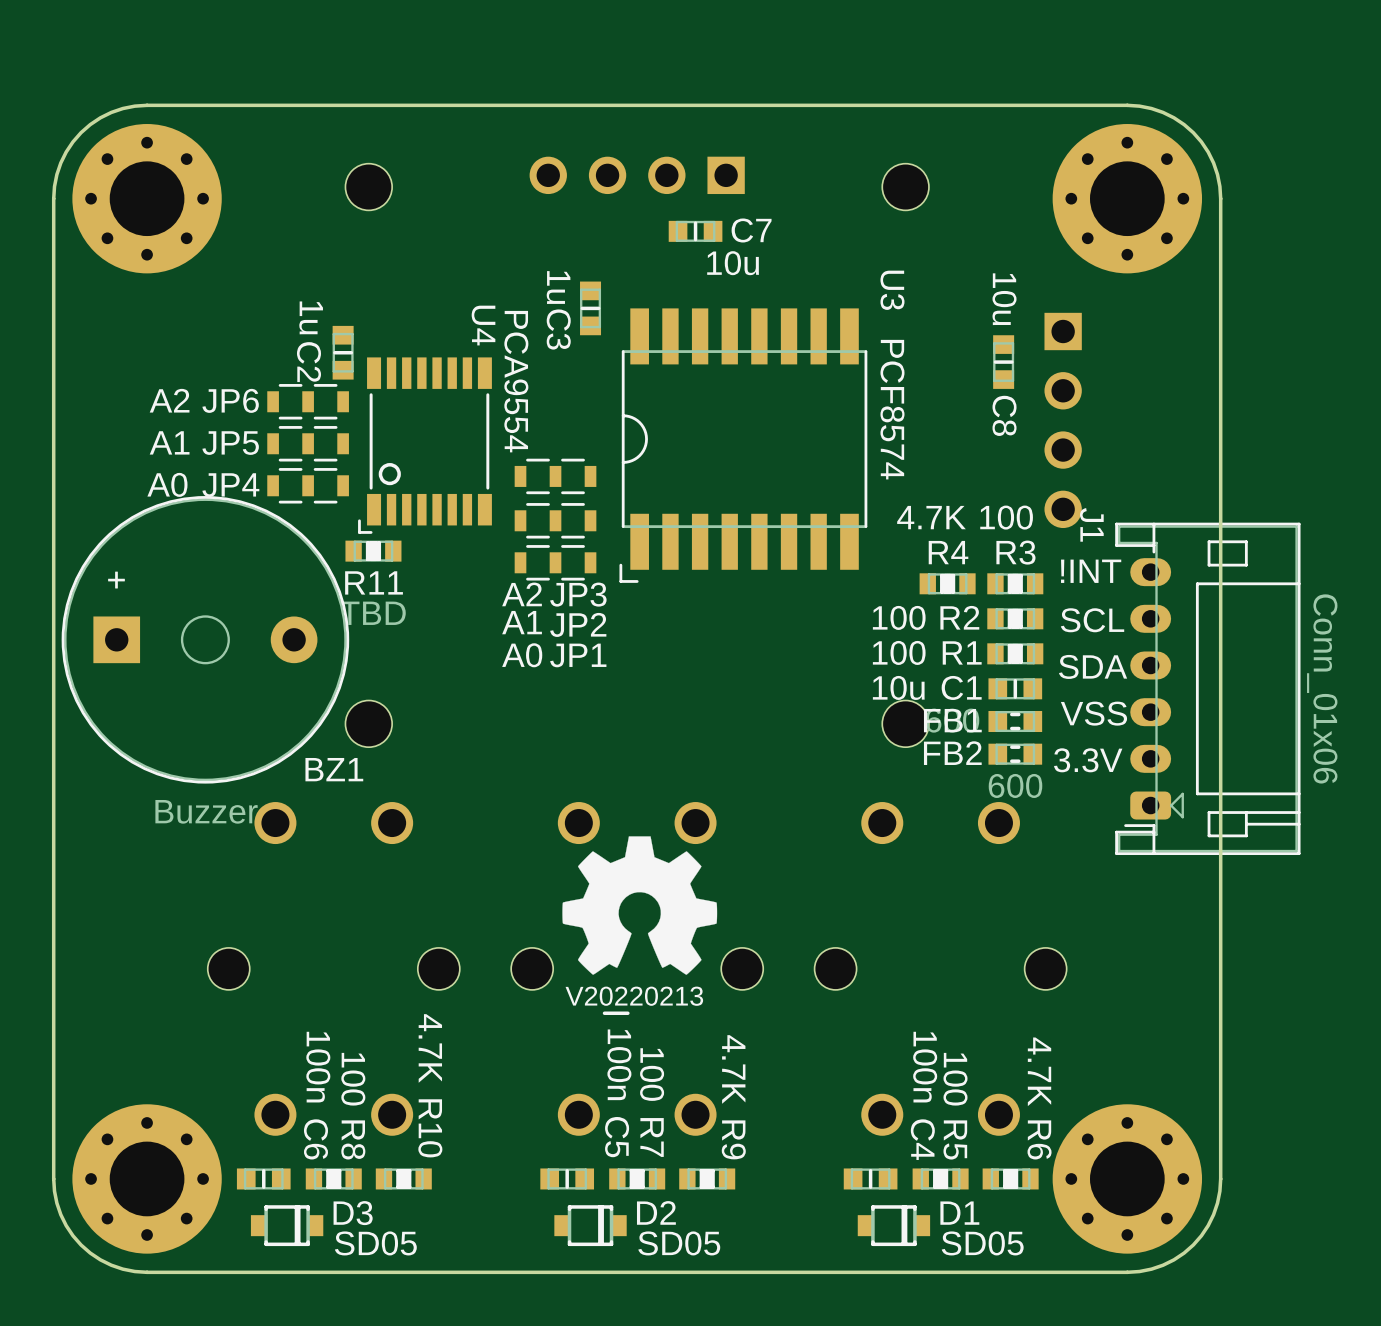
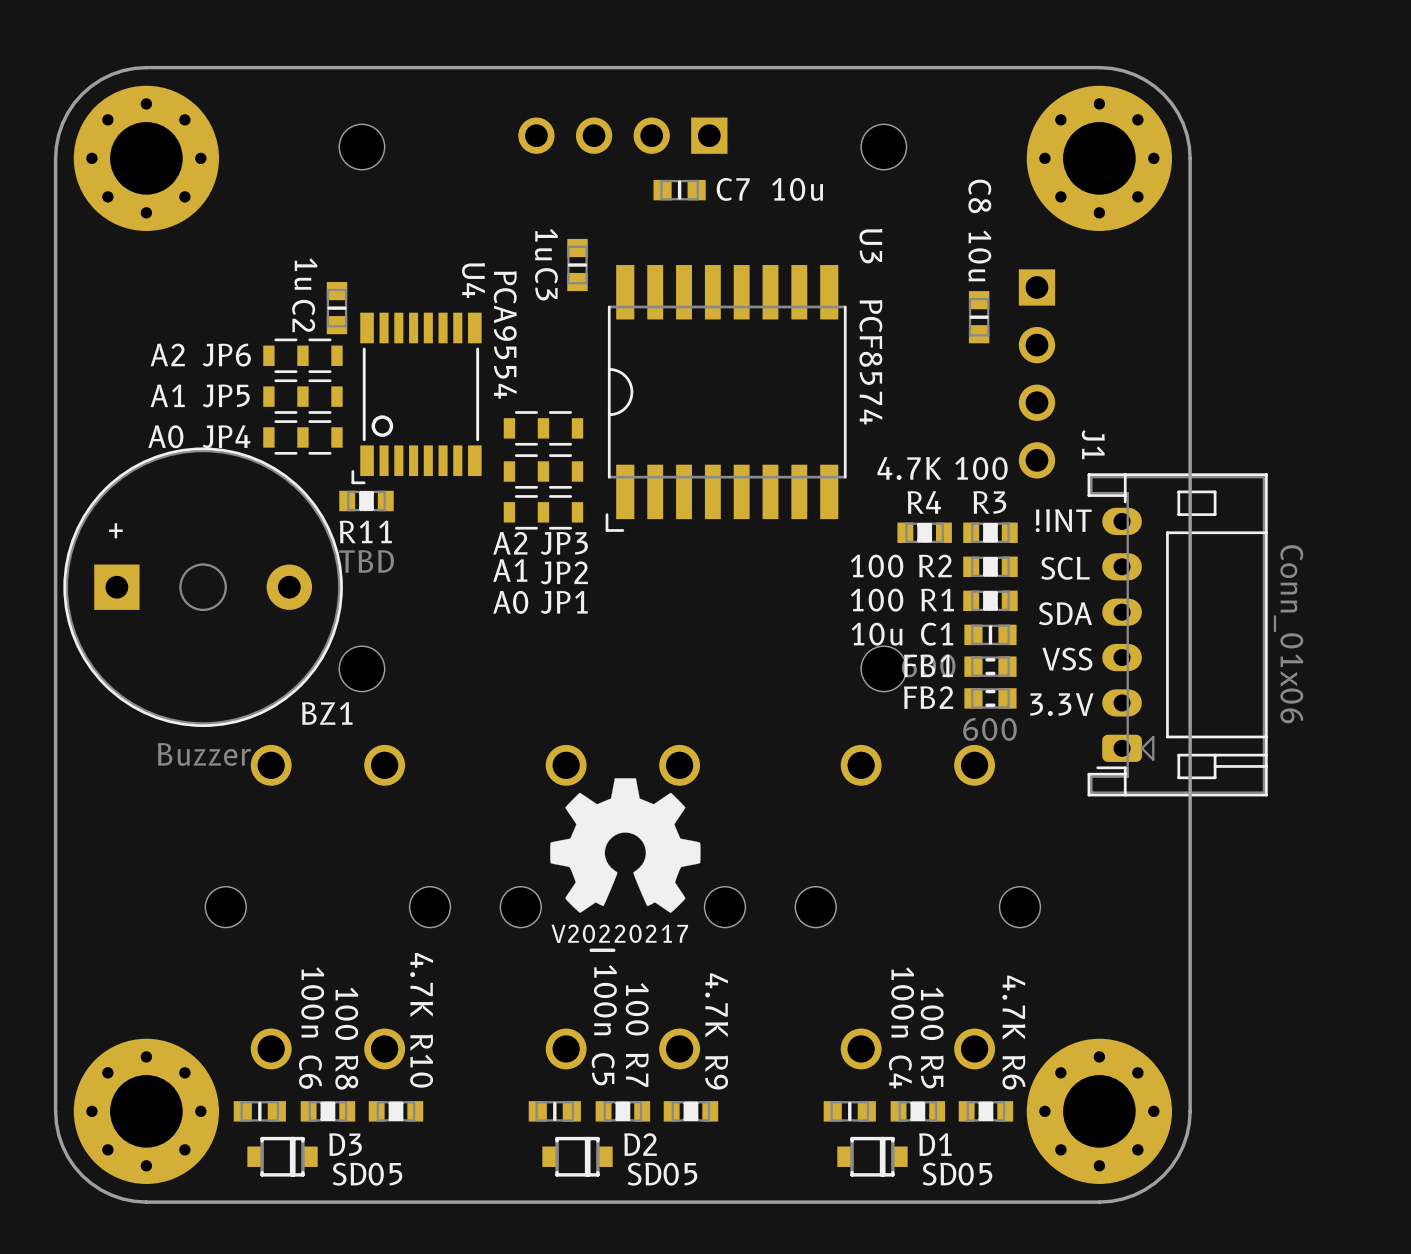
C7 value position: 10u (733, 263) -> 10u (797, 189)
C8 name position: C8 (1004, 415) -> C8 (979, 196)
J1 name position: J1 (1091, 524) -> J1 (1093, 444)
drawing shape: [565, 986, 704, 1016] -> [551, 924, 689, 952]

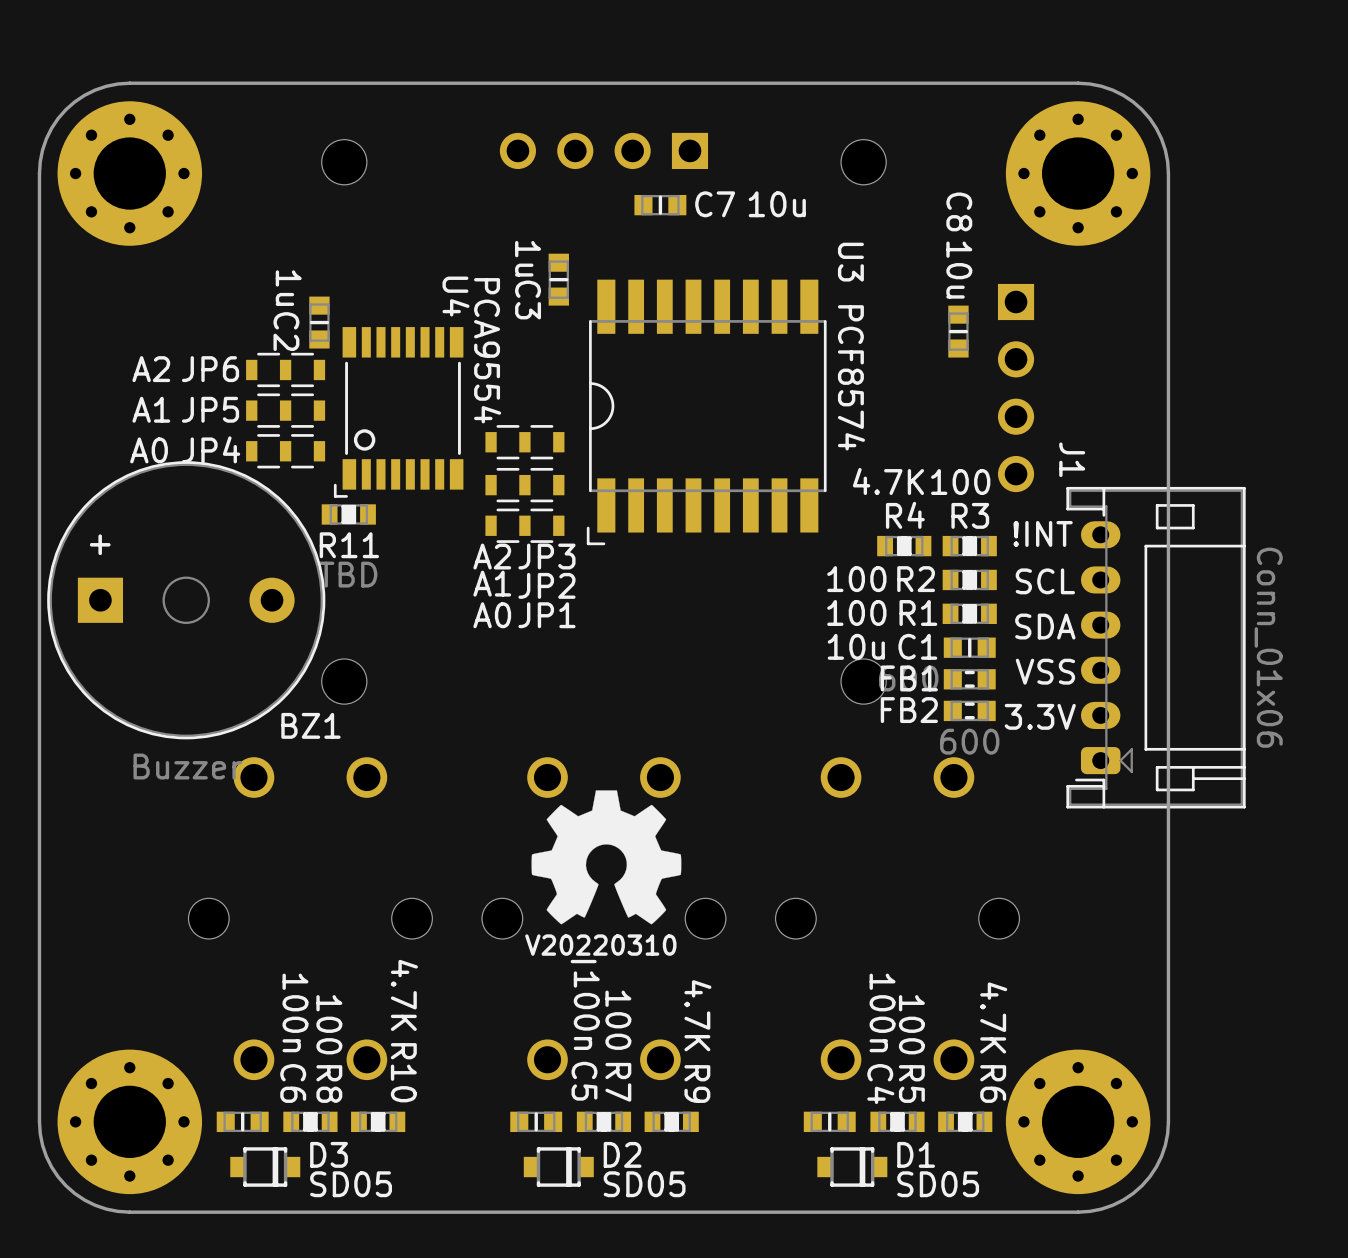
drawing shape: [551, 924, 689, 952] -> [525, 934, 677, 964]

